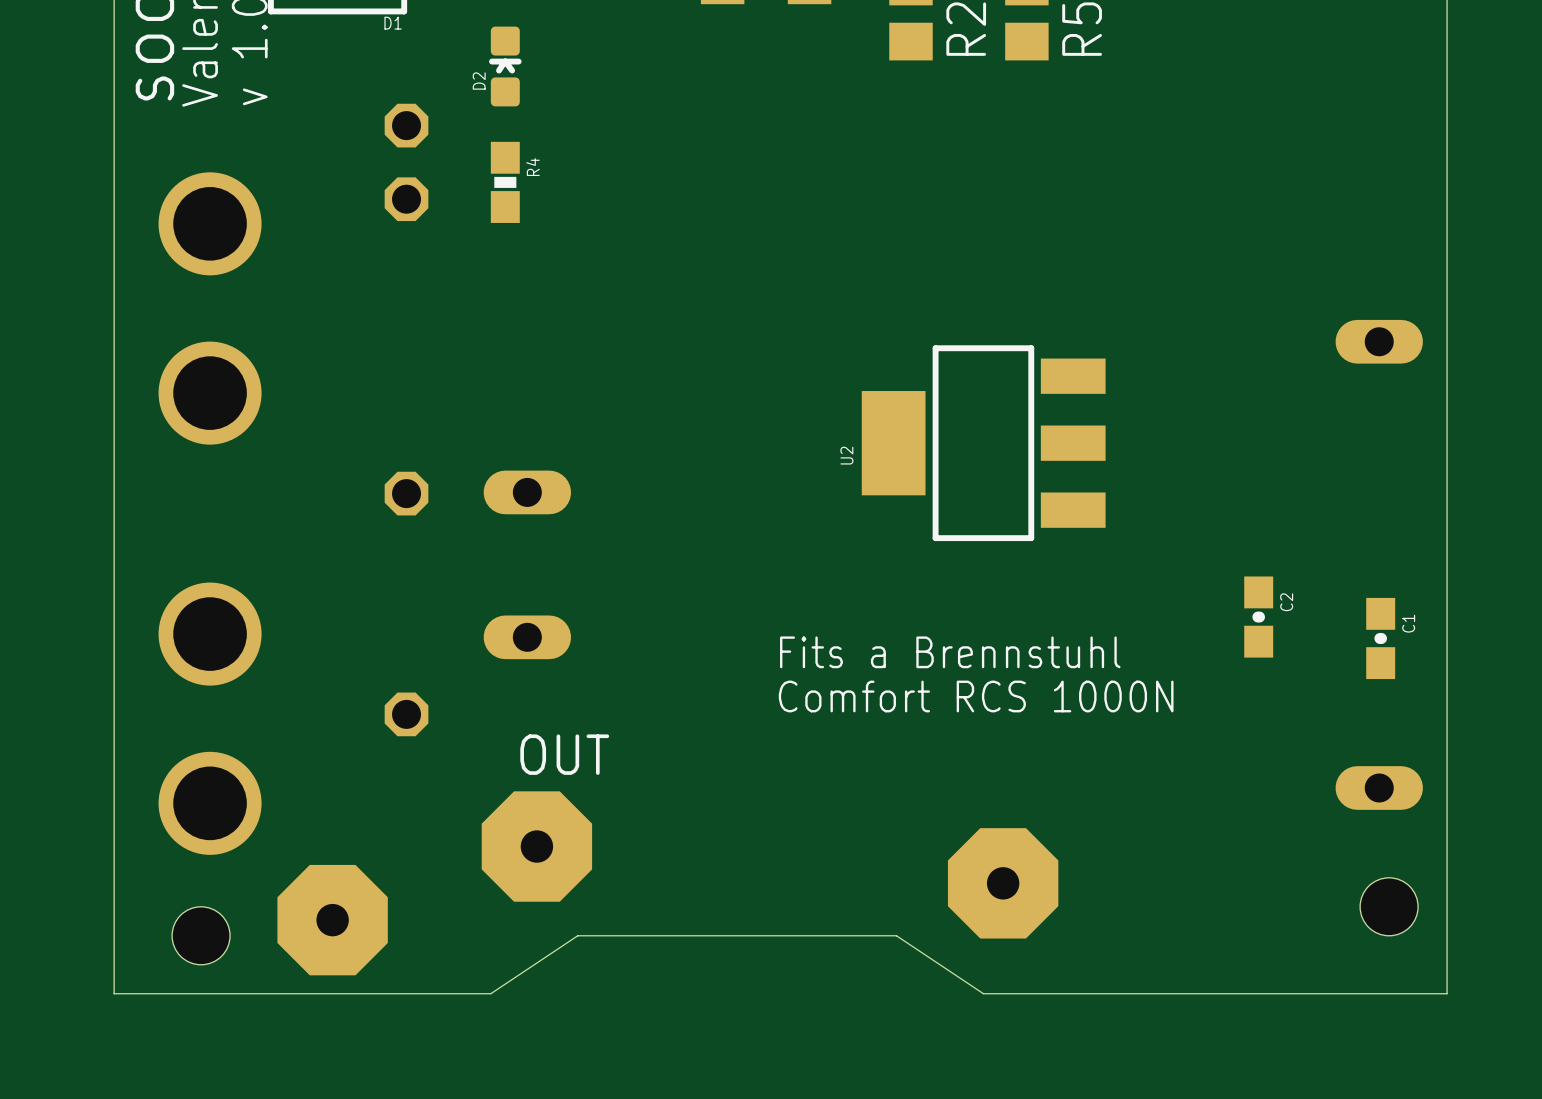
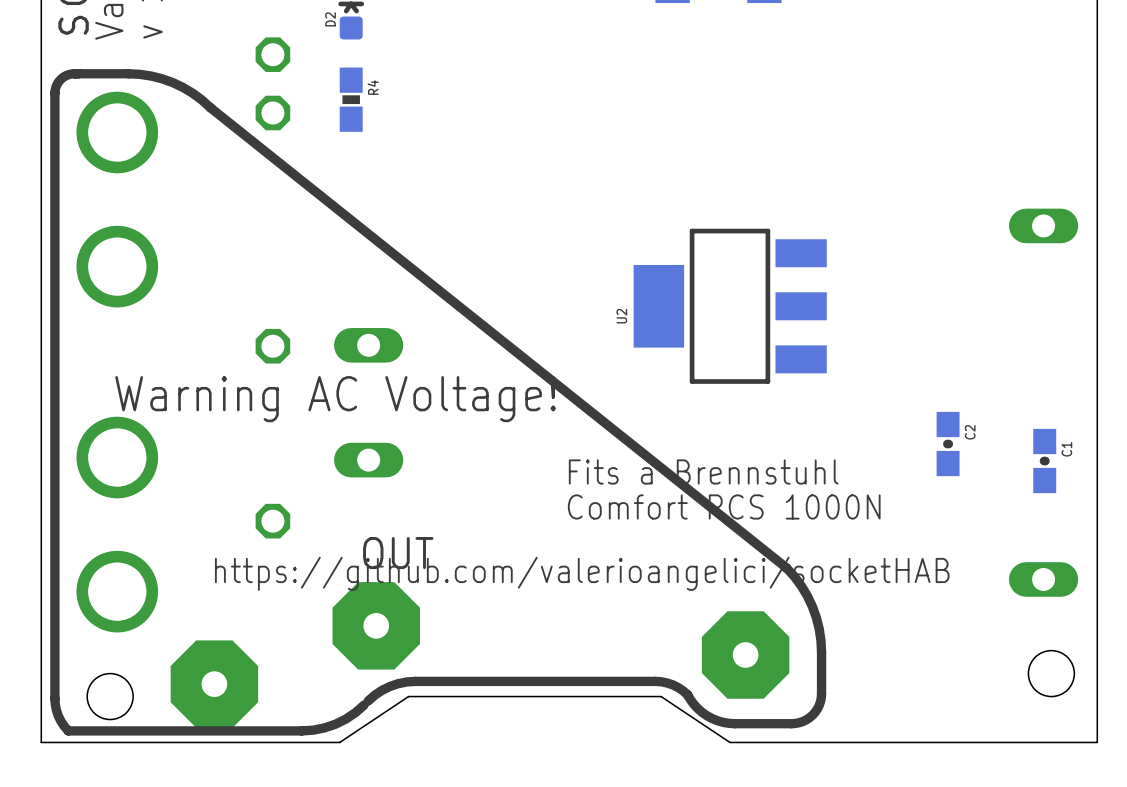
text: none -> Warning AC Voltage! (335, 399)
text: none -> https://github.com/valerioangelici/socketHAB (582, 573)
line: none -> (368, 701) (382, 690) (406, 681) (655, 681) (667, 682) (678, 687) (687, 694) (702, 712) (717, 720) (735, 723) (795, 723) (806, 719) (812, 714) (820, 701) (820, 640) (816, 617) (807, 596) (786, 567) (202, 100) (172, 82) (150, 76) (128, 73) (67, 75) (58, 81) (54, 93) (54, 698) (58, 716) (68, 730) (301, 730) (313, 730) (335, 724) (355, 712) (364, 705)

